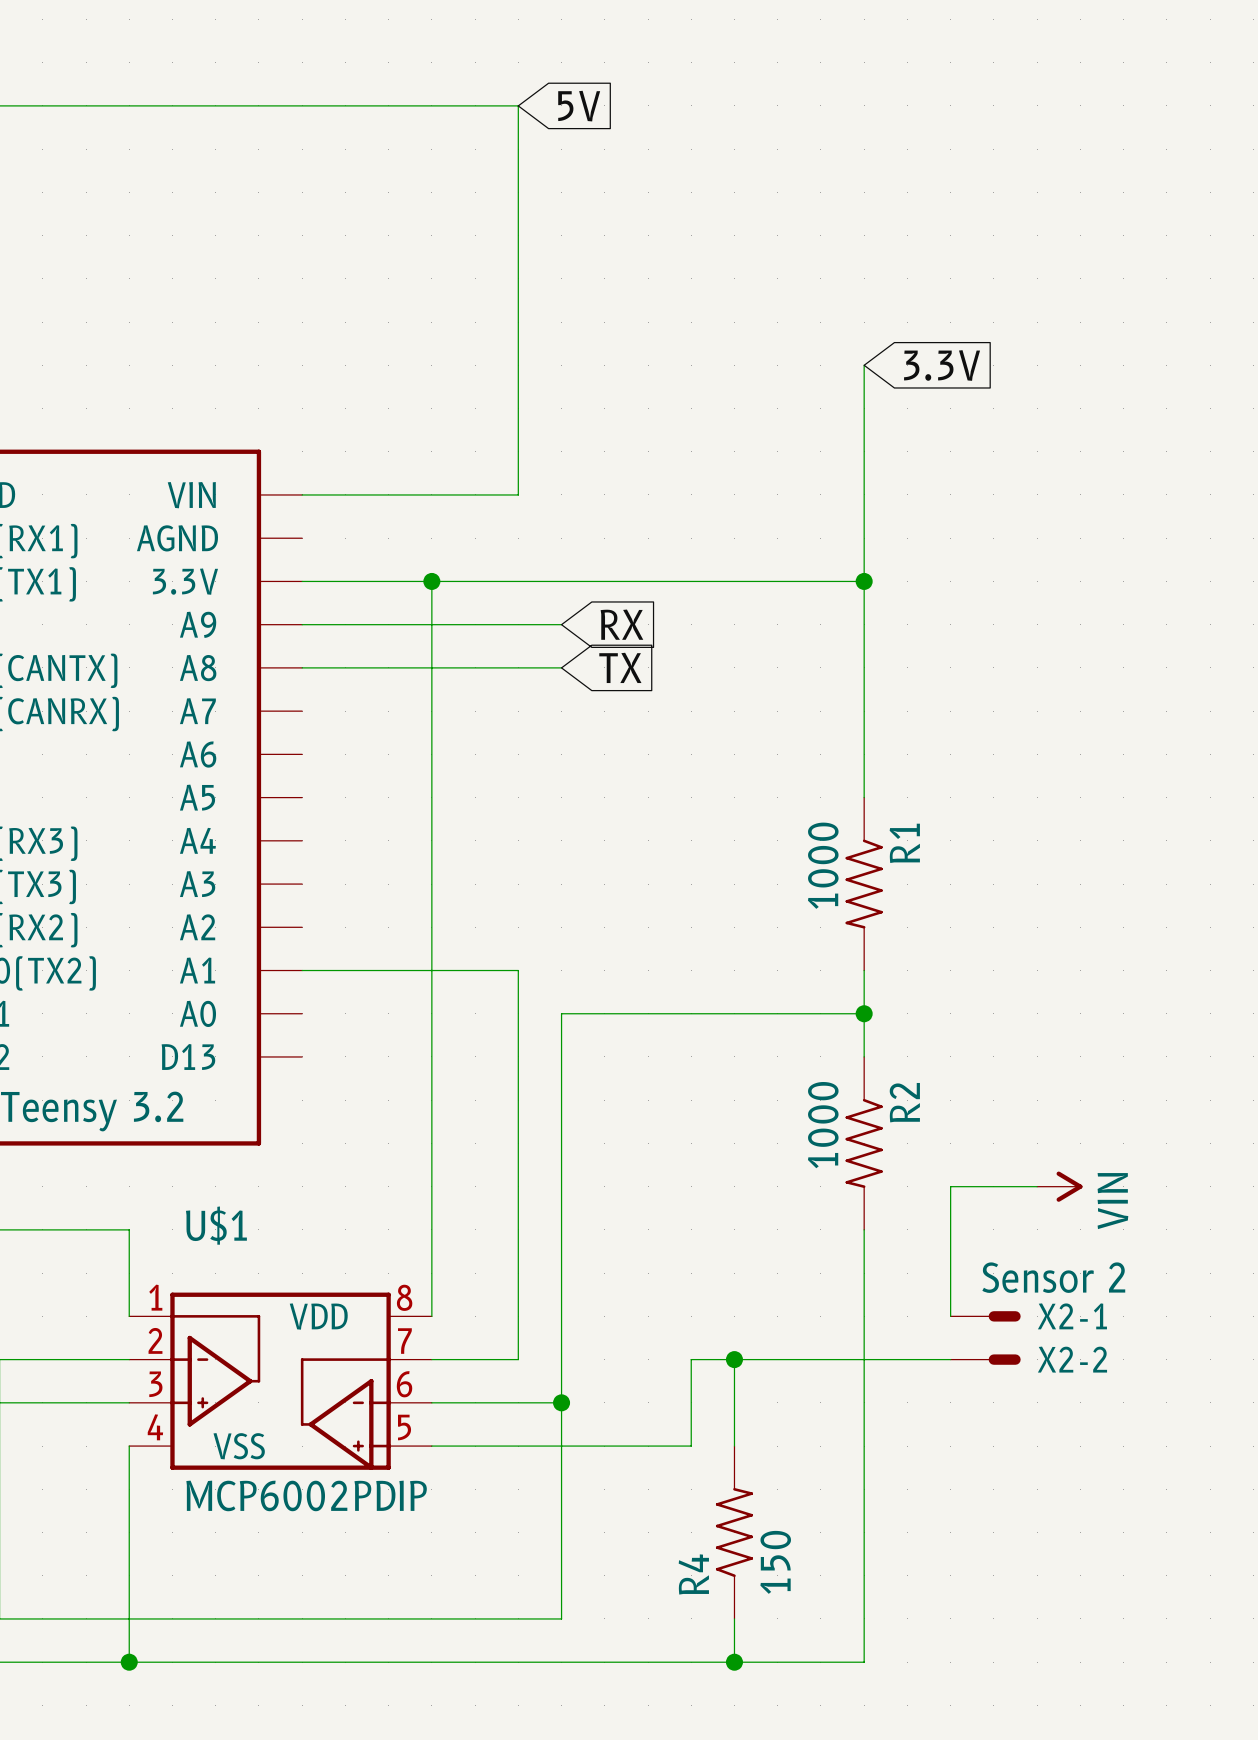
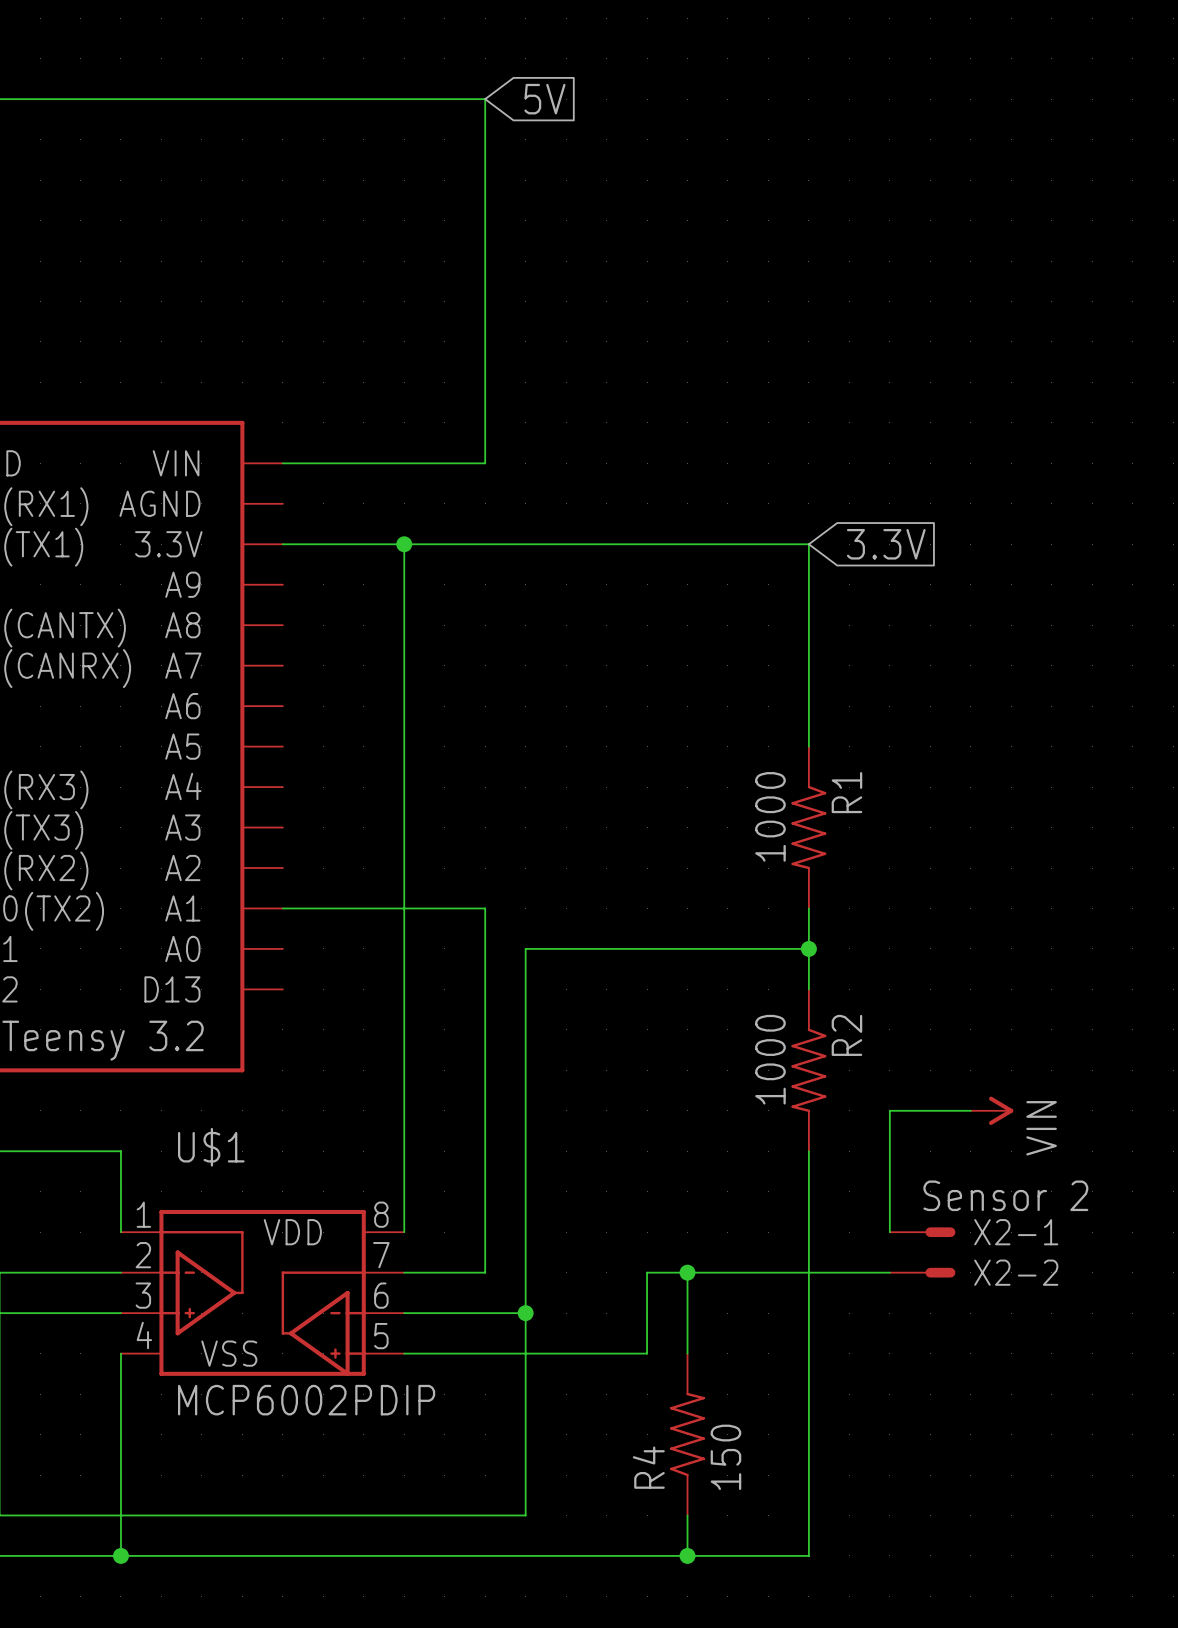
wire: (864, 365) (864, 581) -> none
global label position: 3.3V (942, 365) -> 3.3V (886, 544)
junction: (864, 581) -> none
wire: (302, 624) (561, 624) -> none
global label: RX (621, 624) -> none
wire: (302, 667) (561, 667) -> none
global label: TX (620, 667) -> none

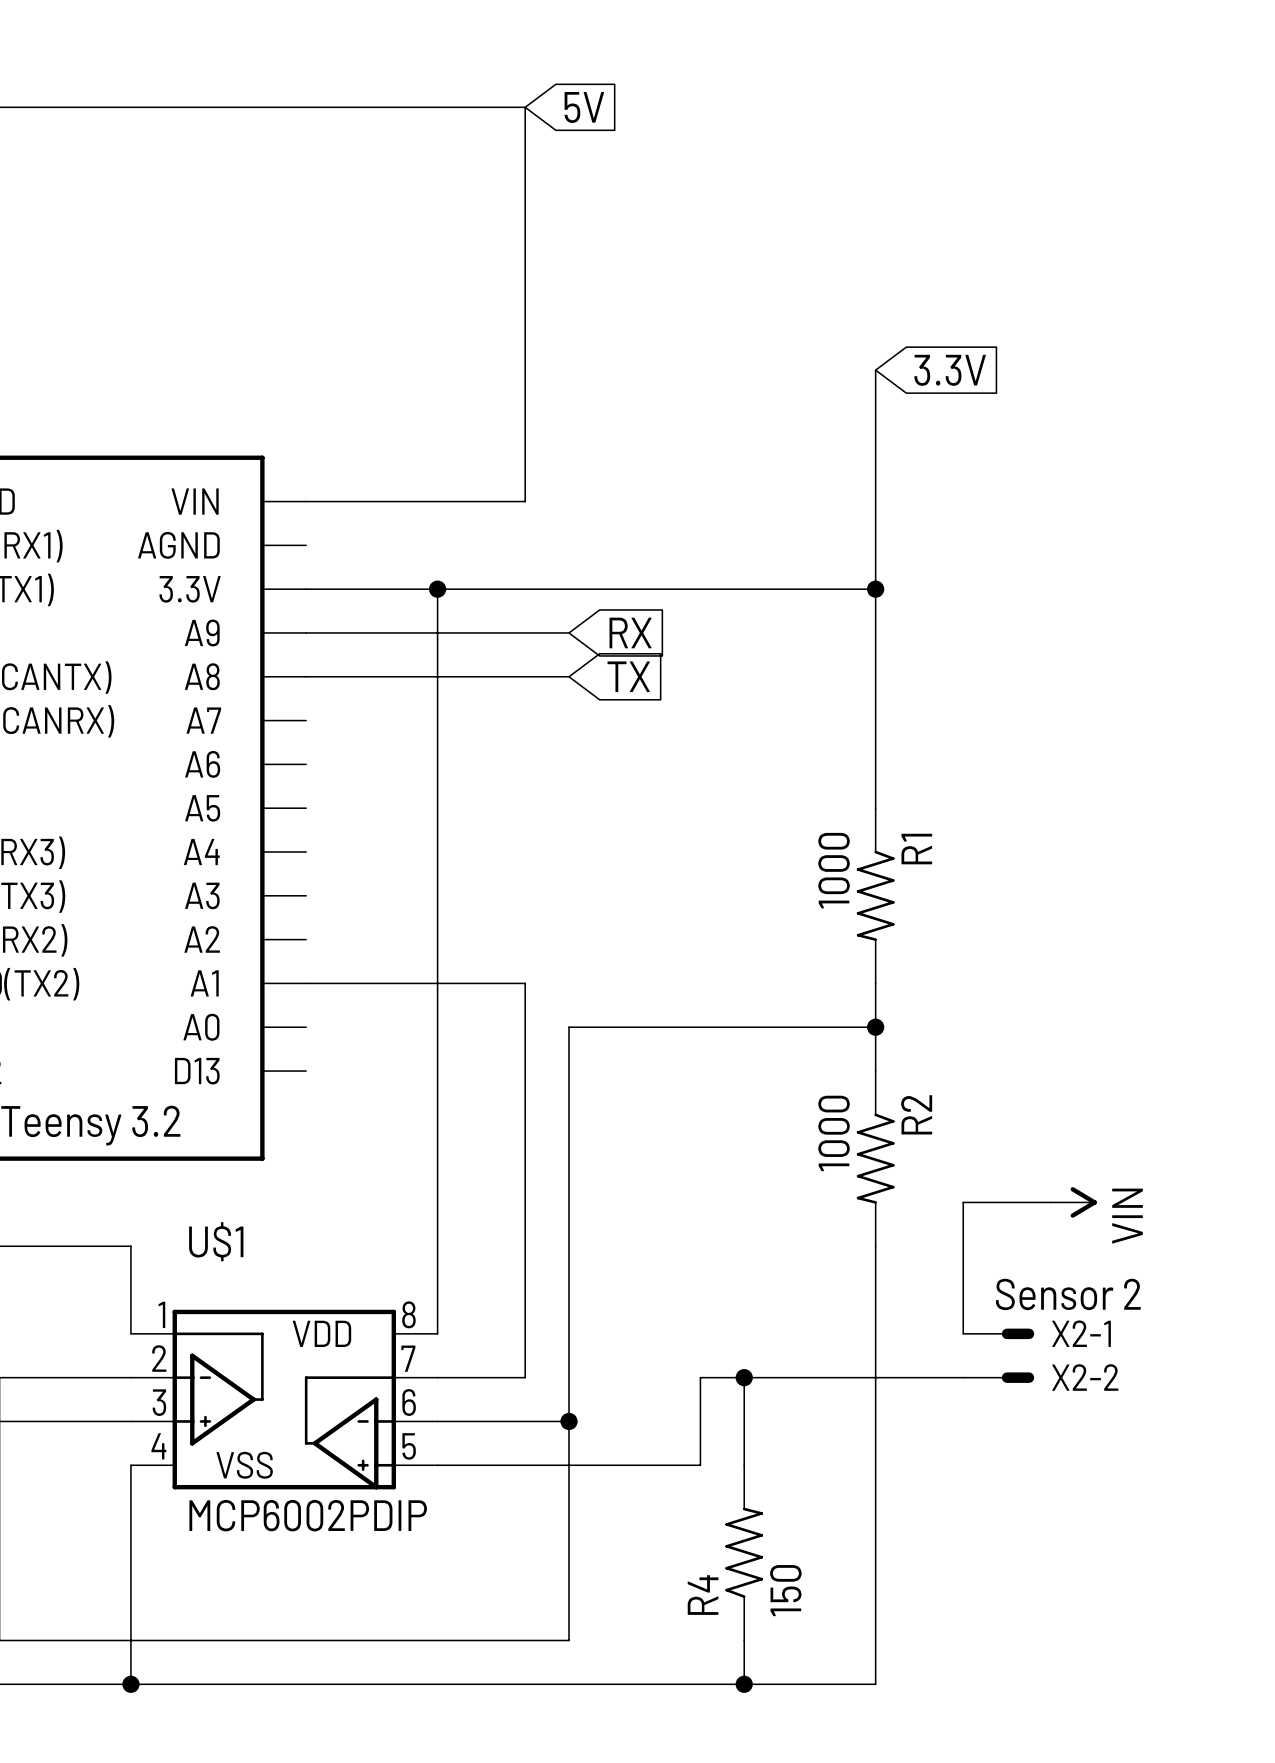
wire: none -> (875, 370) (875, 589)
junction: none -> (875, 589)
global label position: 3.3V (886, 544) -> 3.3V (950, 370)
wire: none -> (306, 632) (569, 632)
global label: none -> RX (630, 632)
wire: none -> (306, 676) (569, 676)
global label: none -> TX (628, 676)

